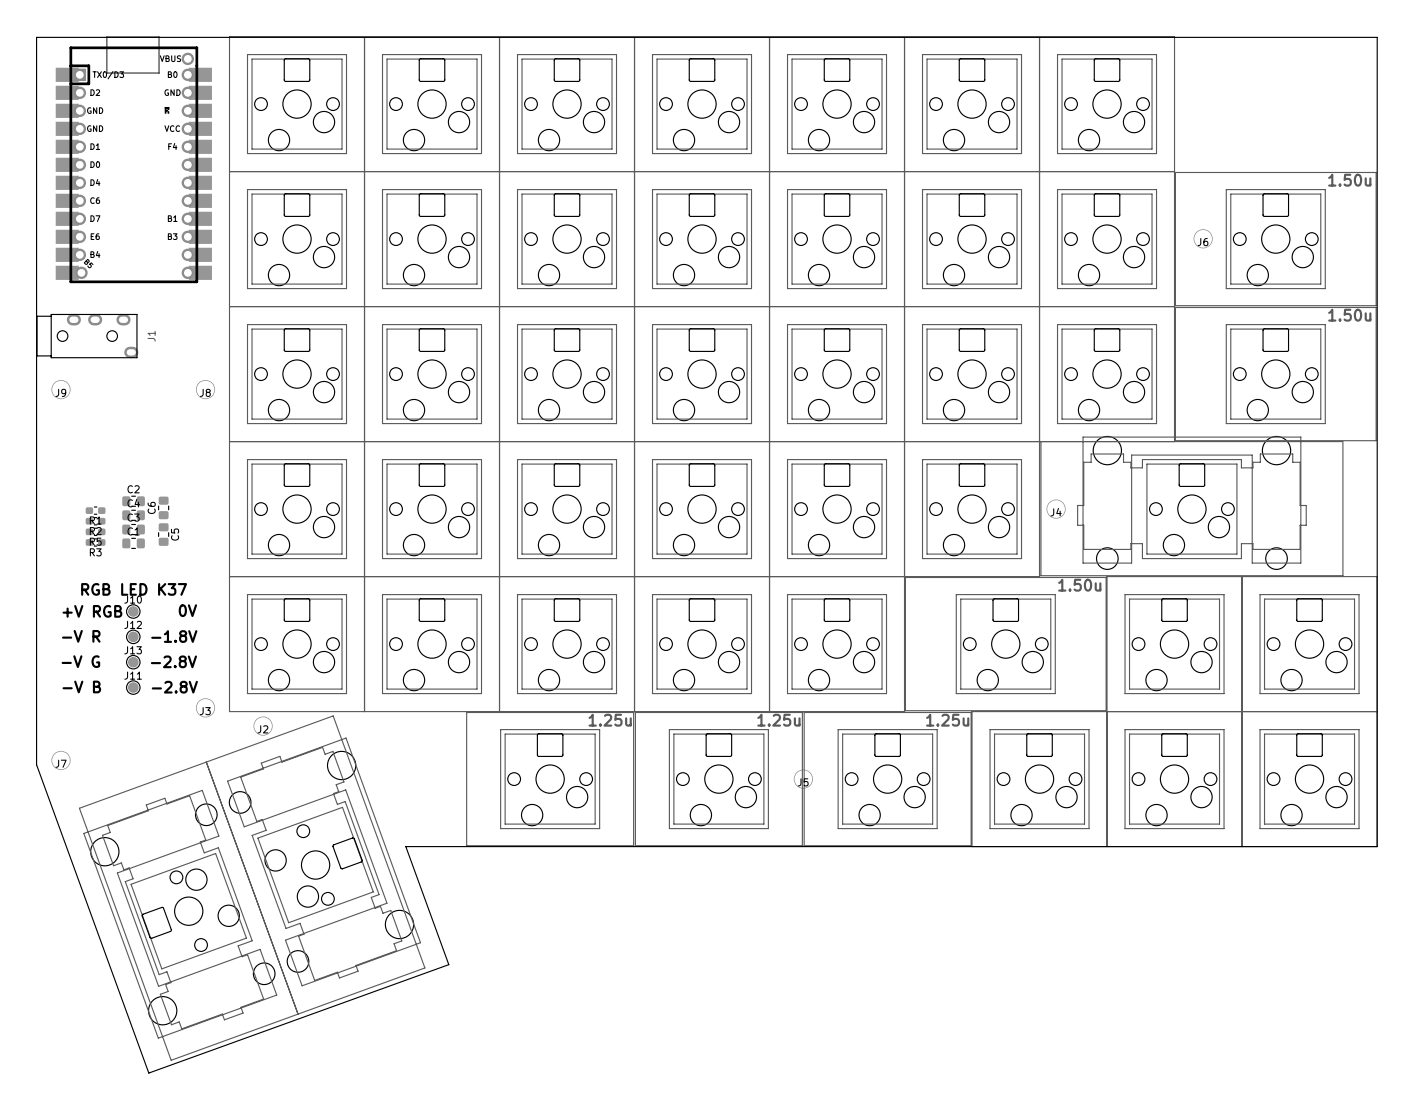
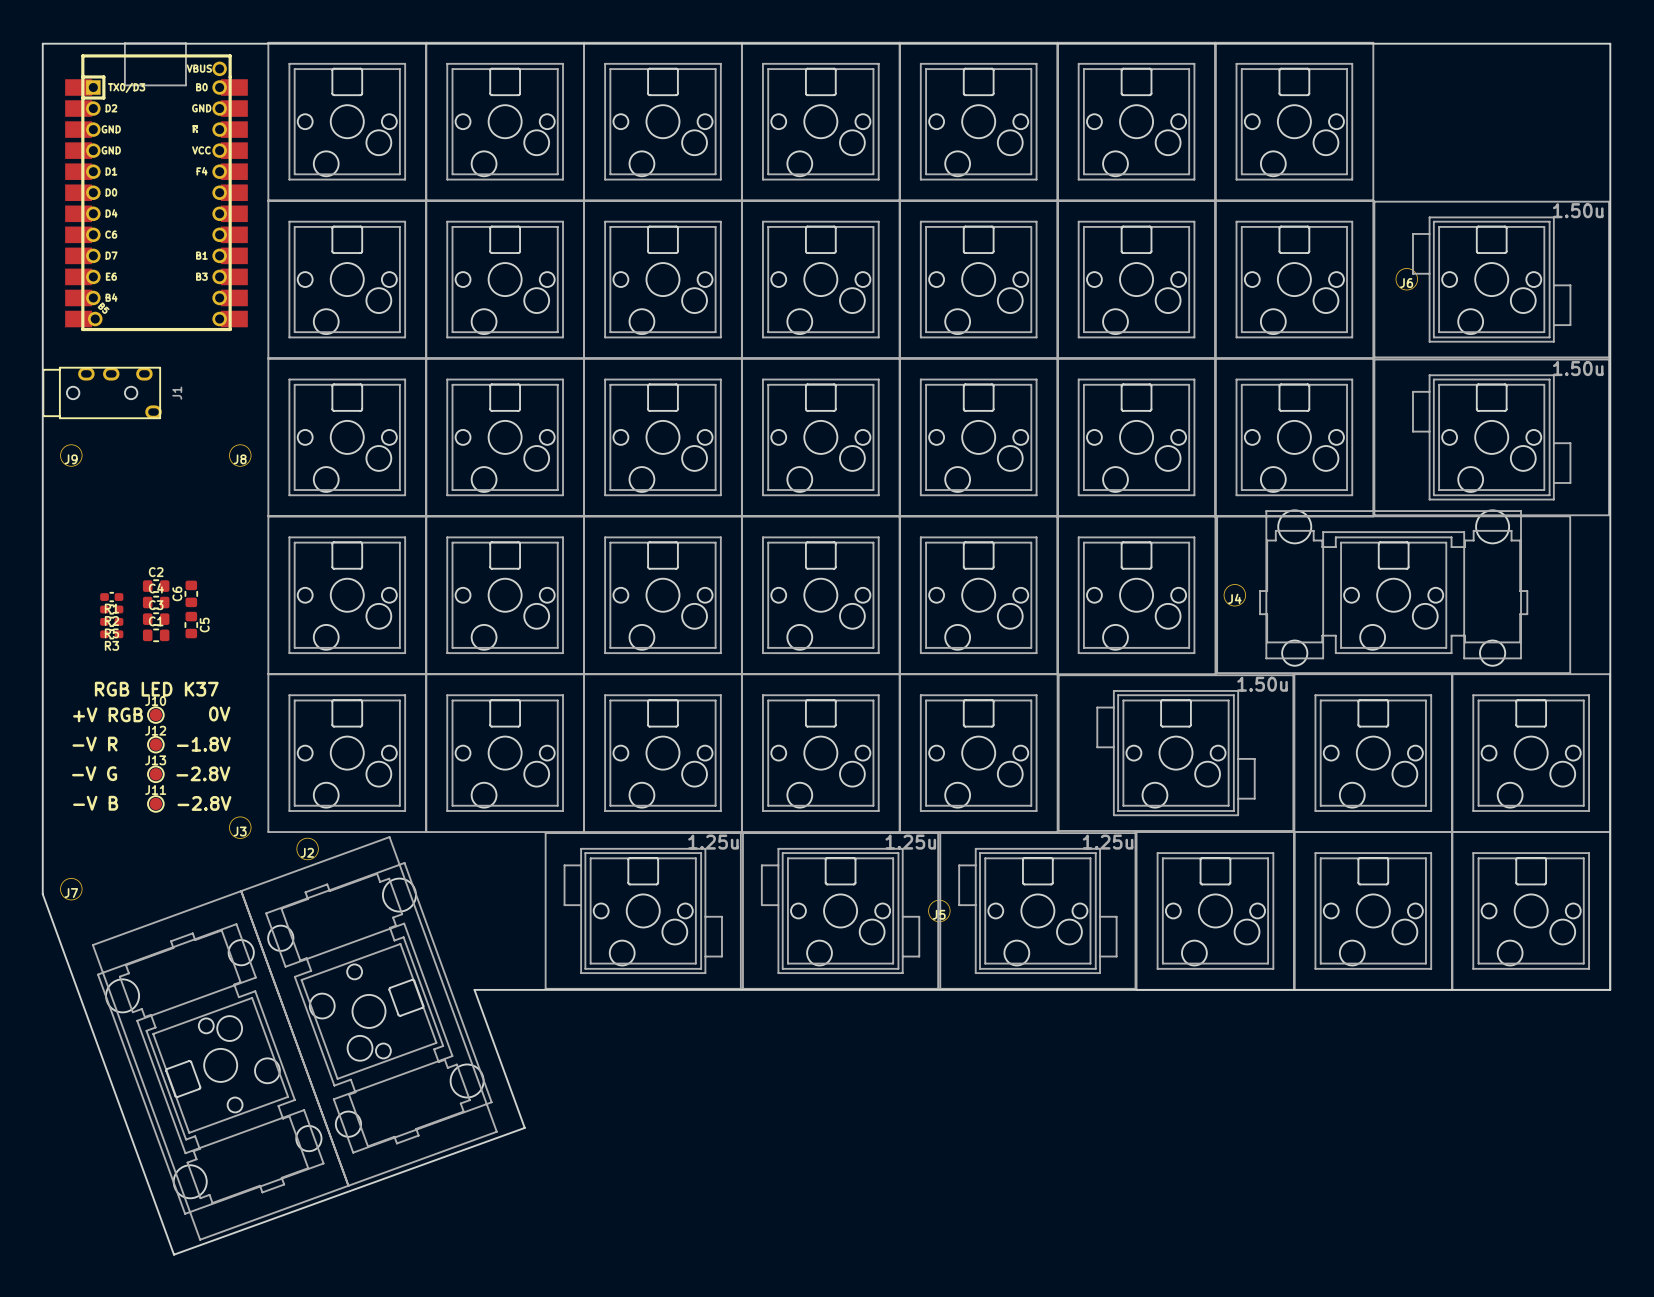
part footprint: [1174, 171, 1377, 307] -> [1373, 201, 1610, 359]
part footprint: [1174, 306, 1377, 442] -> [1373, 358, 1610, 516]
part footprint: [904, 576, 1107, 712] -> [1058, 674, 1294, 832]
part footprint: [466, 711, 635, 847] -> [545, 832, 742, 990]
part footprint: [634, 711, 803, 847] -> [742, 832, 939, 990]
part footprint: [803, 711, 972, 847] -> [939, 832, 1137, 990]

